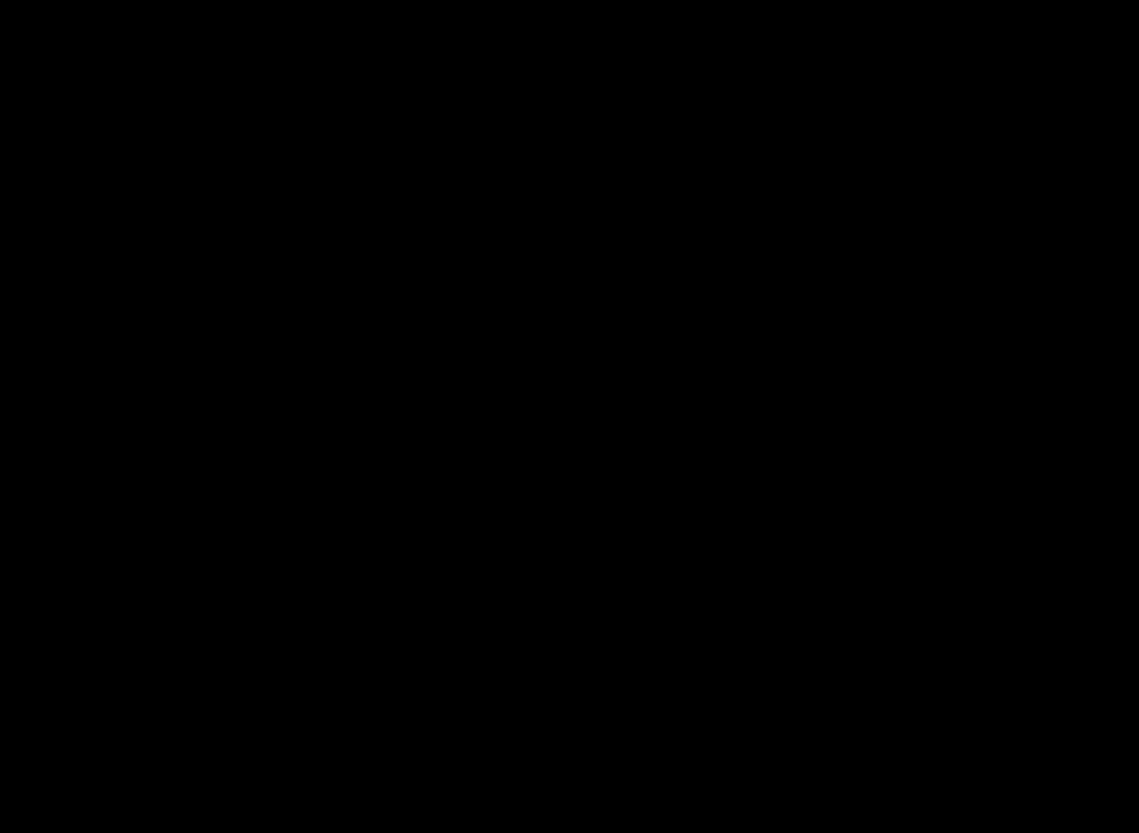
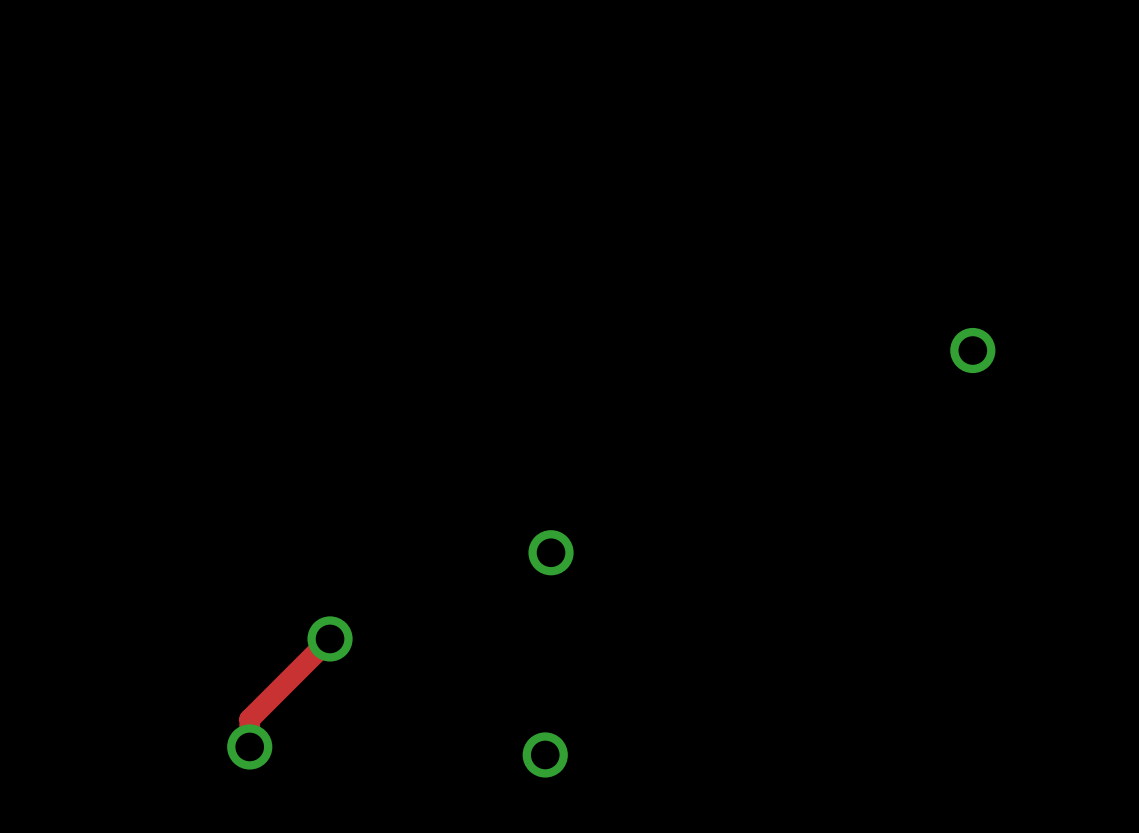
via: none -> (972, 350)
via: none -> (551, 552)
track: none -> (330, 638) (249, 719) (249, 746)
via: none -> (330, 638)
via: none -> (249, 746)
via: none -> (545, 754)

